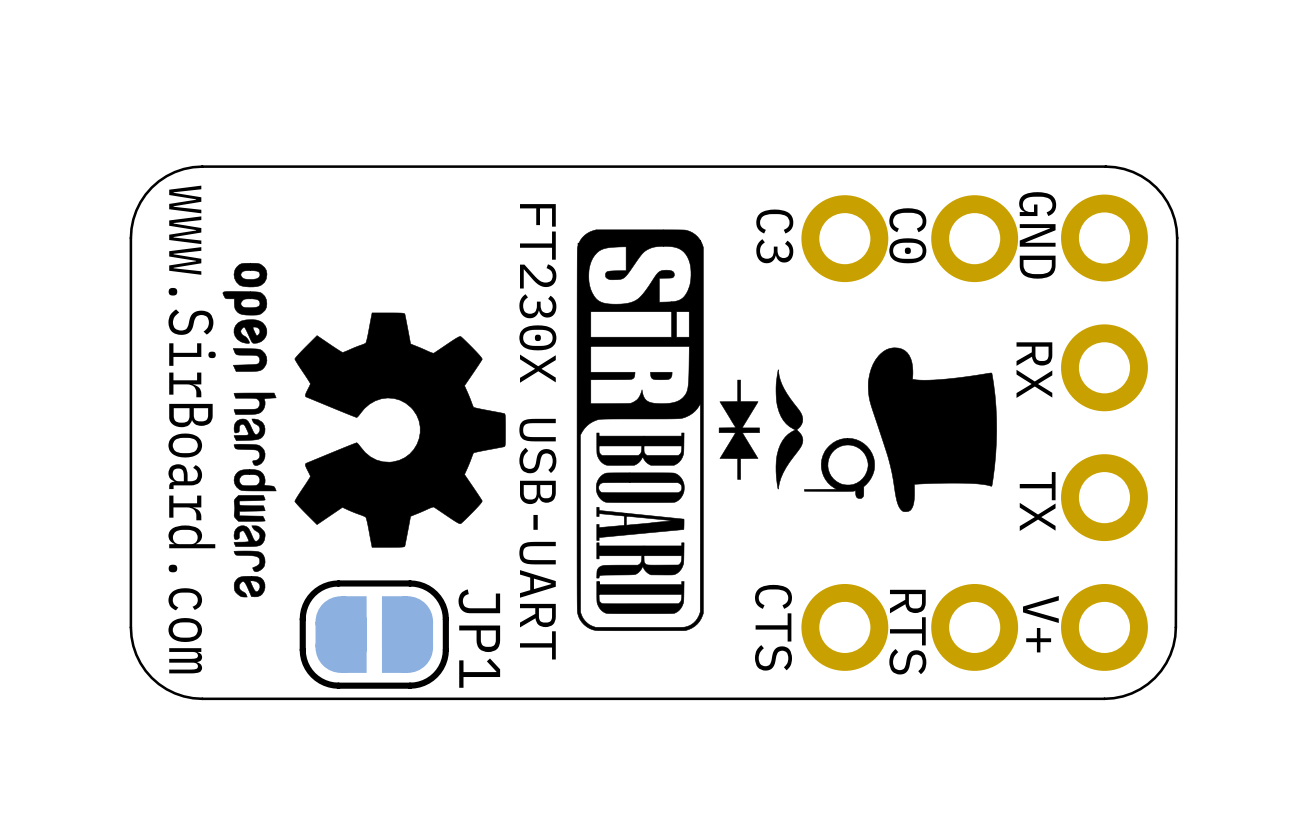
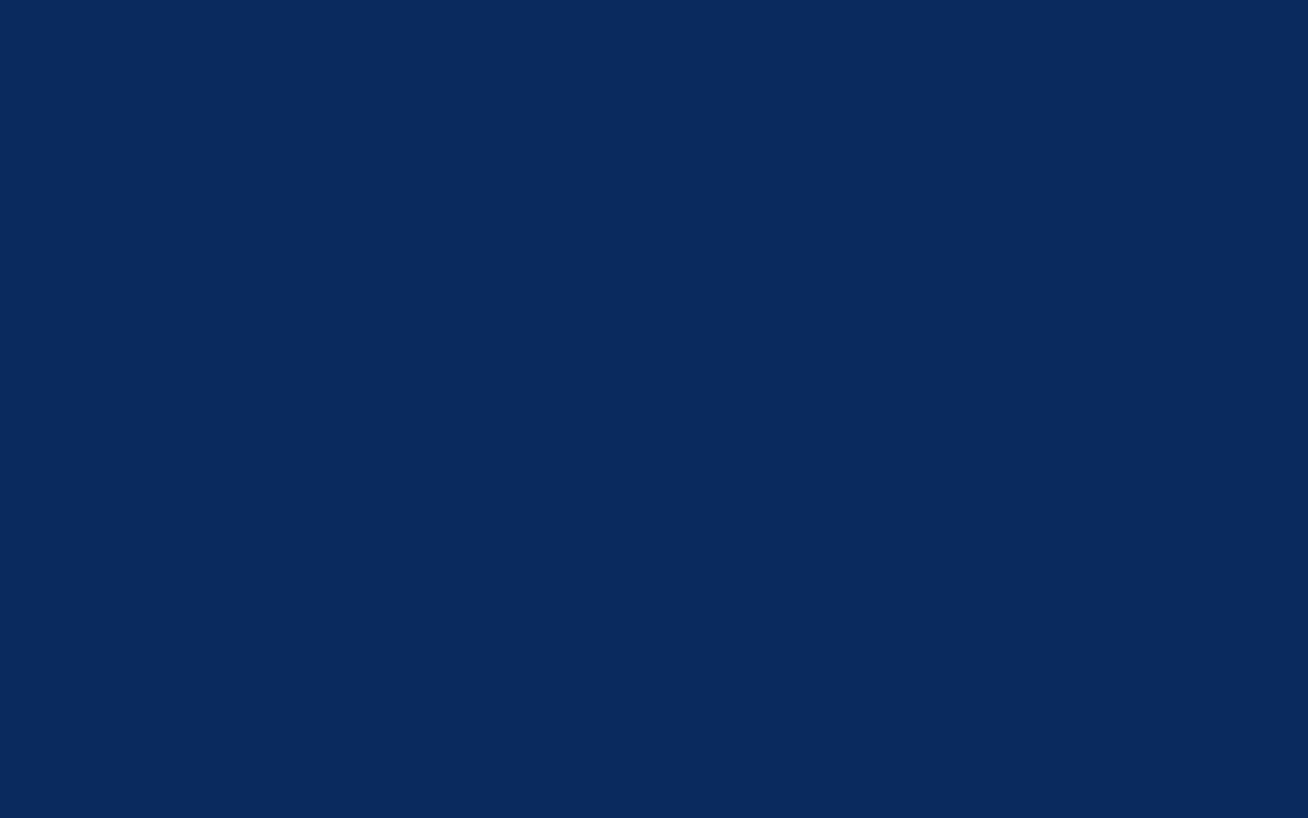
board edge: (1105, 166) (202, 166) (183, 169) (166, 176) (151, 187) (140, 202) (133, 219) (130, 238) (130, 627) (133, 645) (140, 663) (151, 677) (166, 689) (183, 696) (202, 698) (1104, 698) (1122, 696) (1140, 689) (1154, 677) (1166, 663) (1175, 636) (1177, 238) (1171, 210) (1156, 187) (1133, 172) (1105, 166) -> none
drawing: [576, 229, 997, 632] -> none
text: C0 (907, 235) -> none
text: GND (1037, 235) -> none
text: C3 (774, 236) -> none
part: (909, 238) -> none
drawing: [222, 262, 506, 598] -> none
text: RX (1034, 370) -> none
text: www.SirBoard.com (192, 429) -> none
text: FT230X USB-UART (537, 431) -> none
part: (1104, 432) -> none
text: TX (1037, 501) -> none
text: V+ (1040, 624) -> none
text: CTS (773, 627) -> none
part: (909, 627) -> none
text: RTS (907, 632) -> none
JP1: (374, 634) -> none

